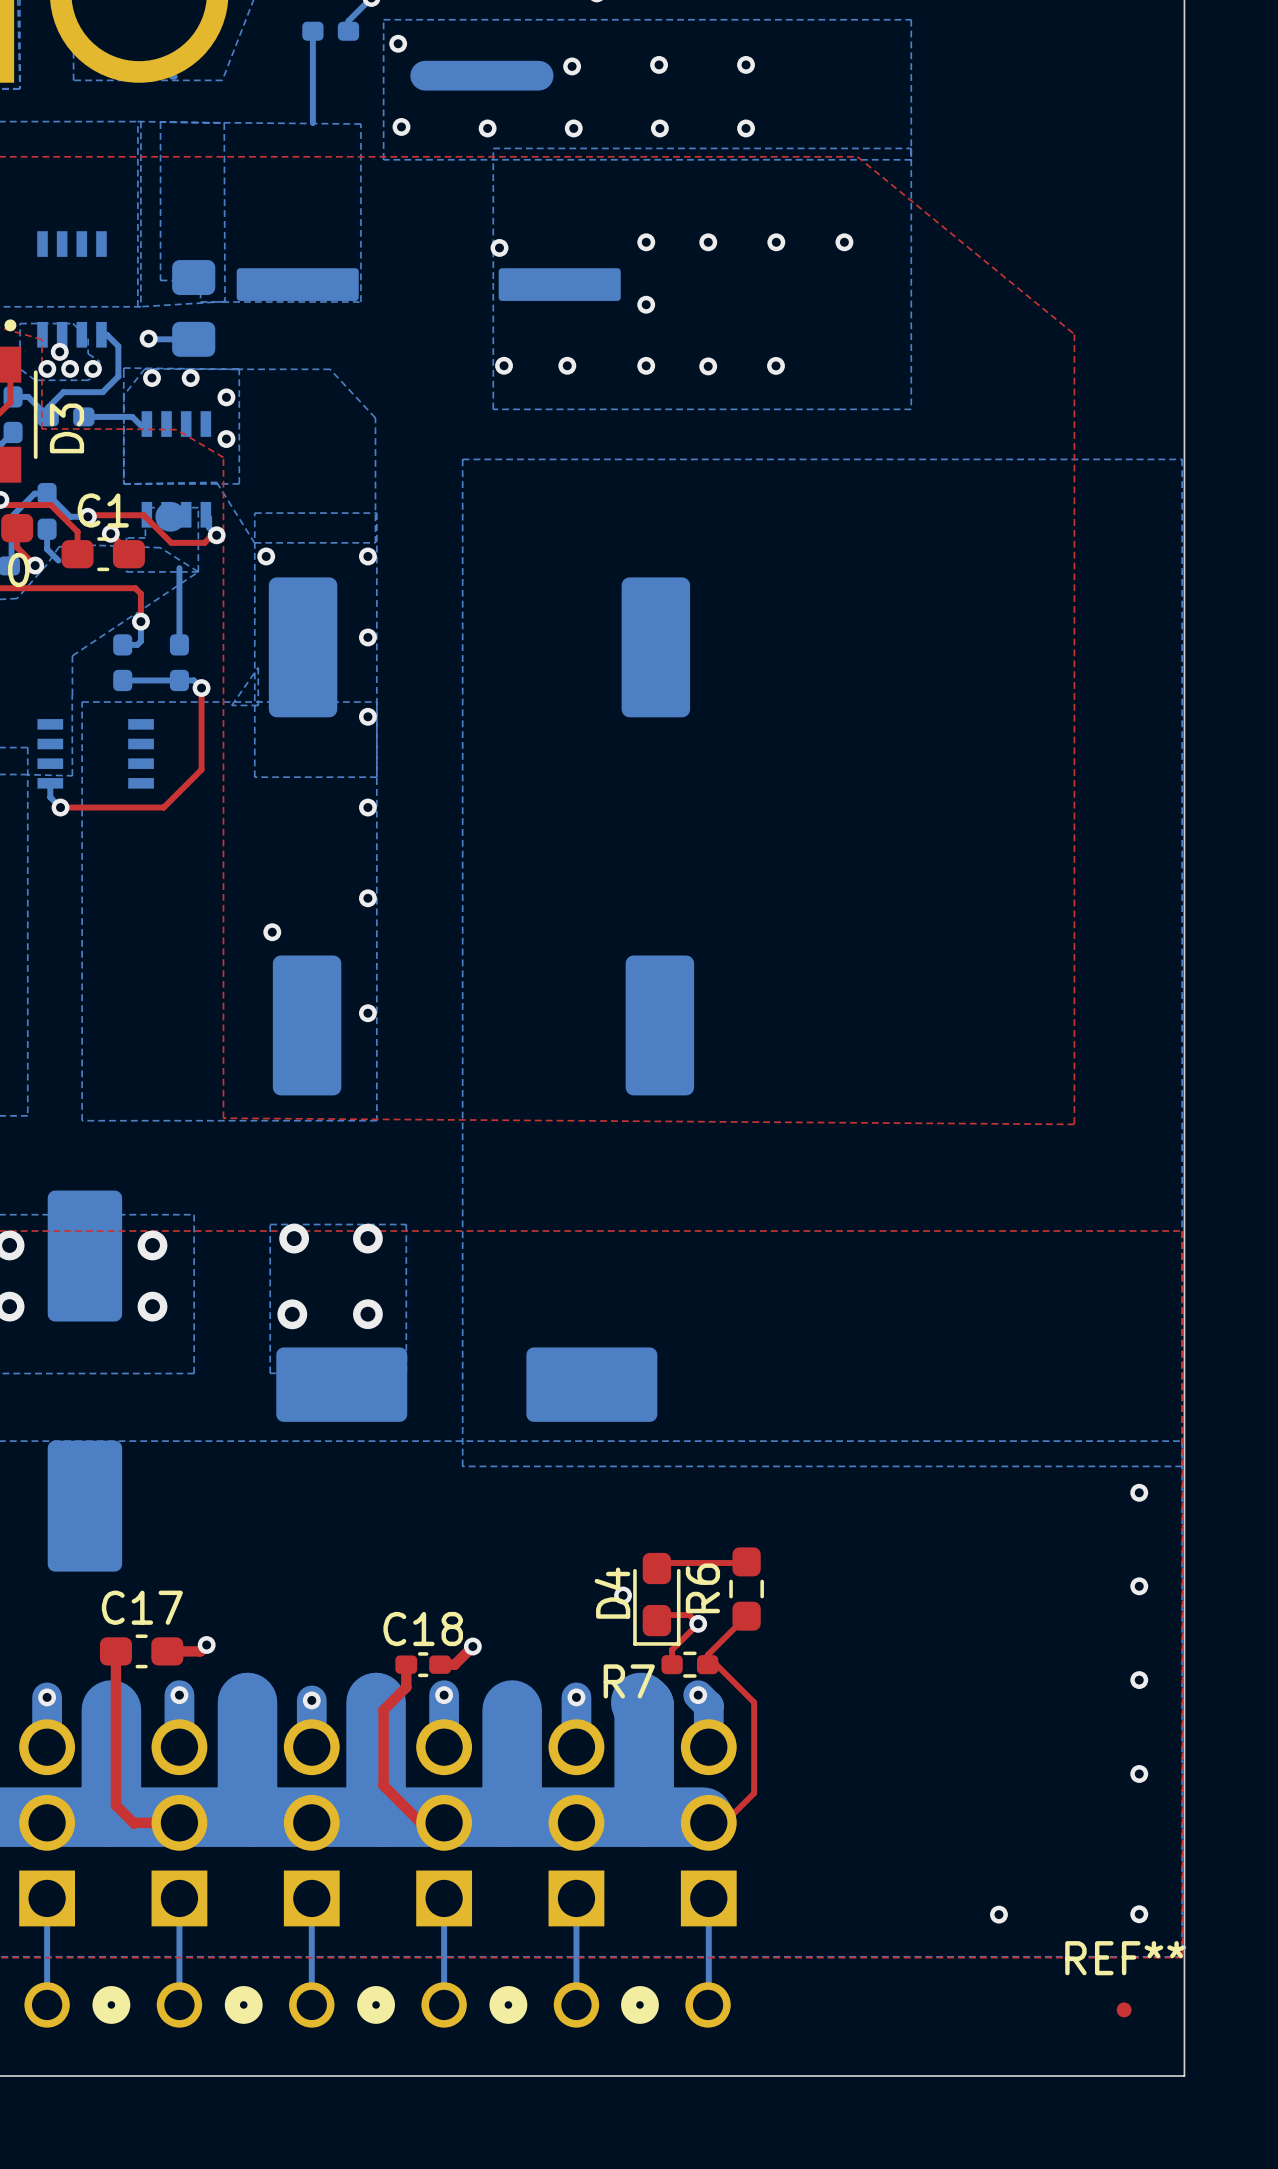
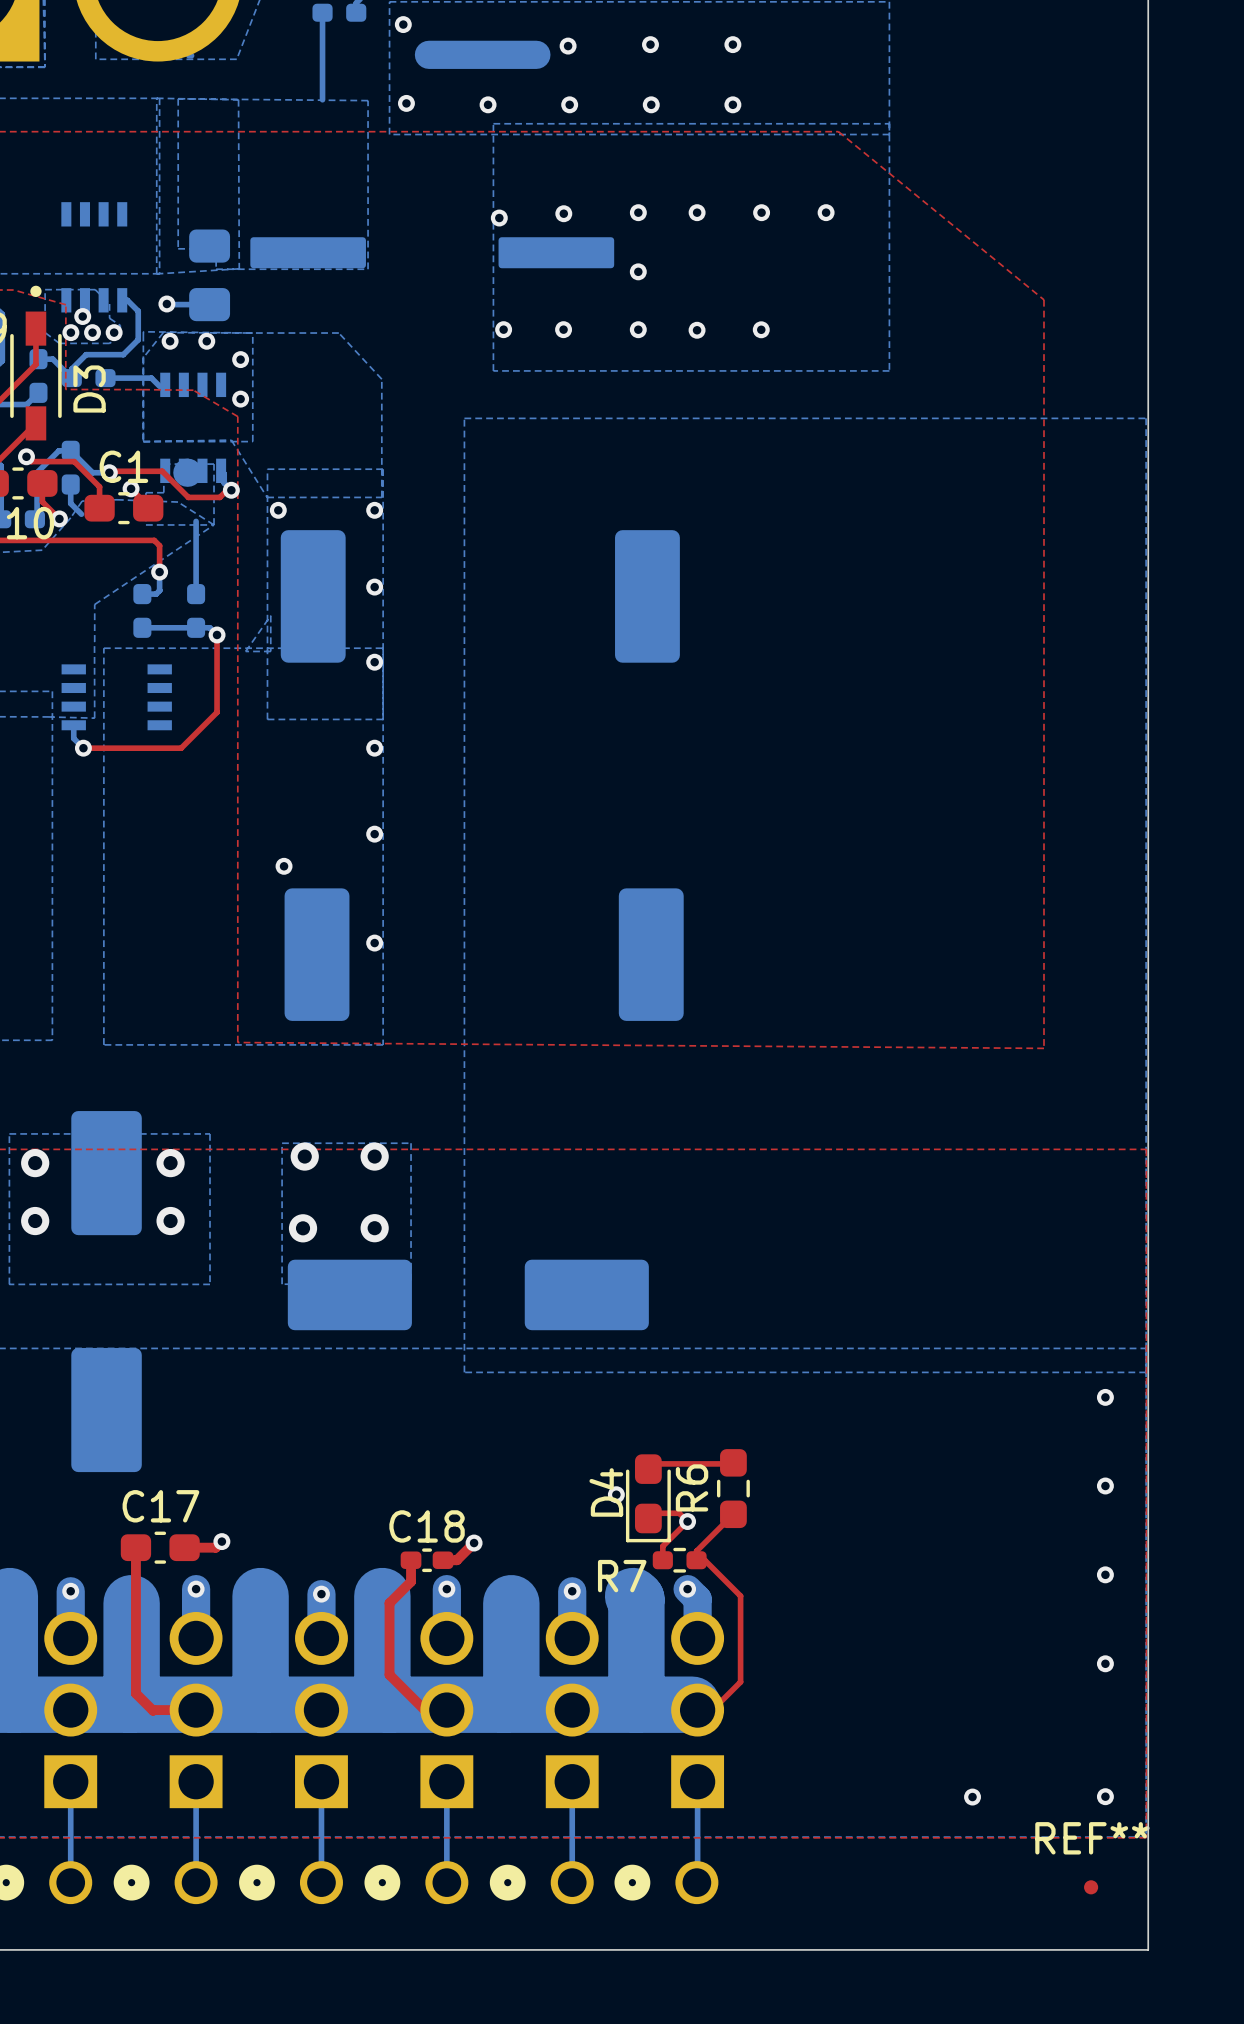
via: none -> (563, 213)

